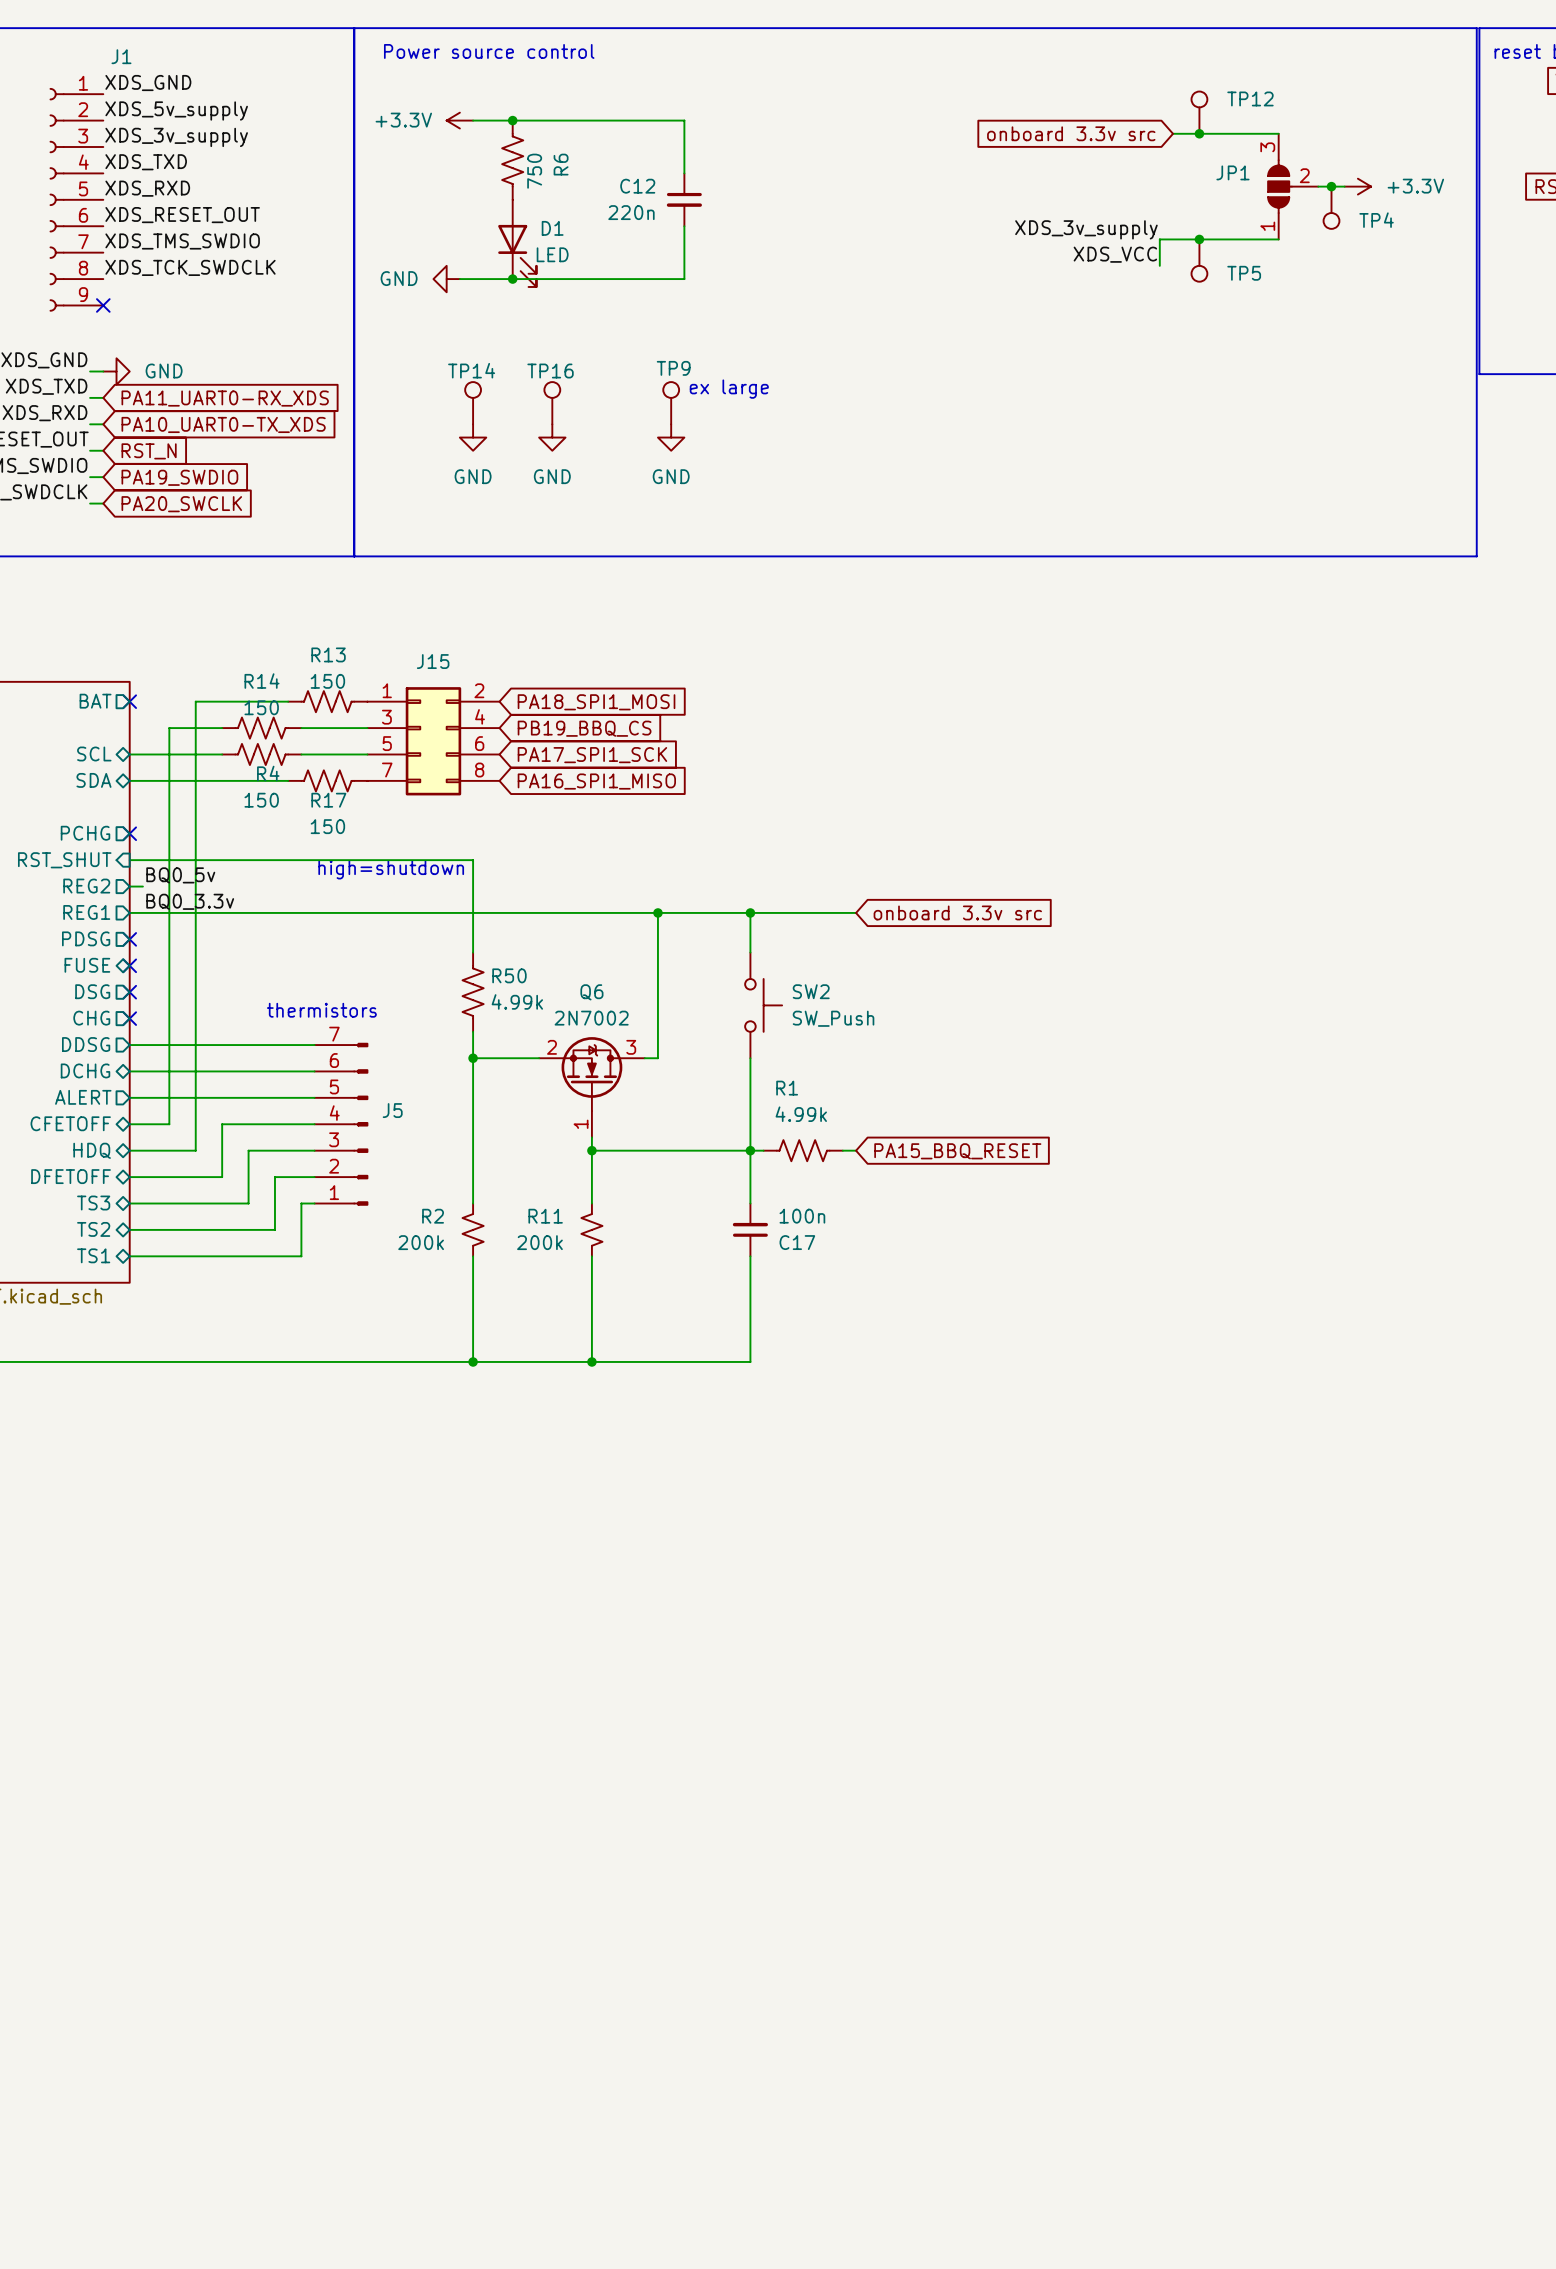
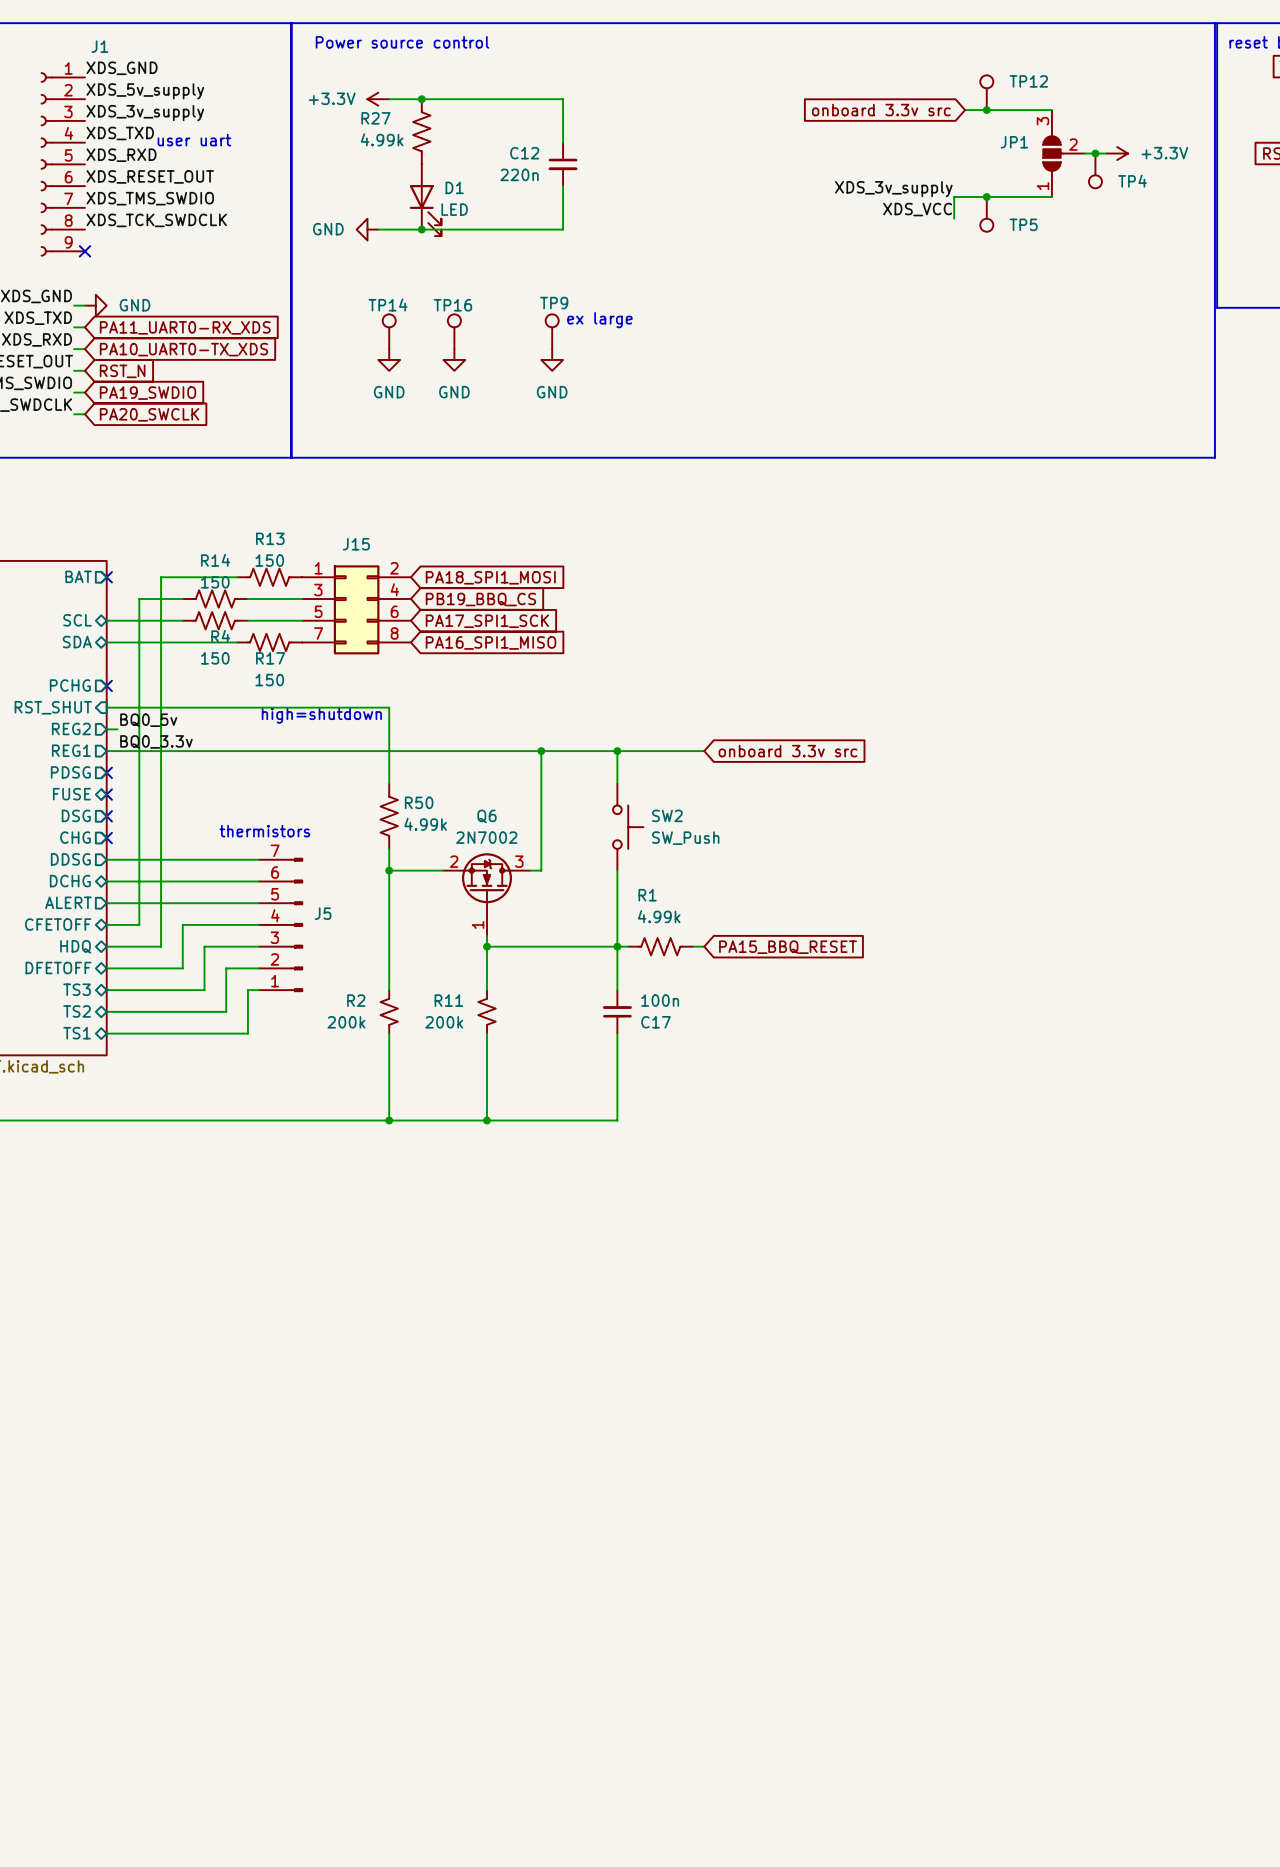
R6 name: R6 (561, 164) -> R27 (375, 118)
text: none -> user uart (194, 140)
R6 value: 750 (534, 171) -> 4.99k (382, 139)

